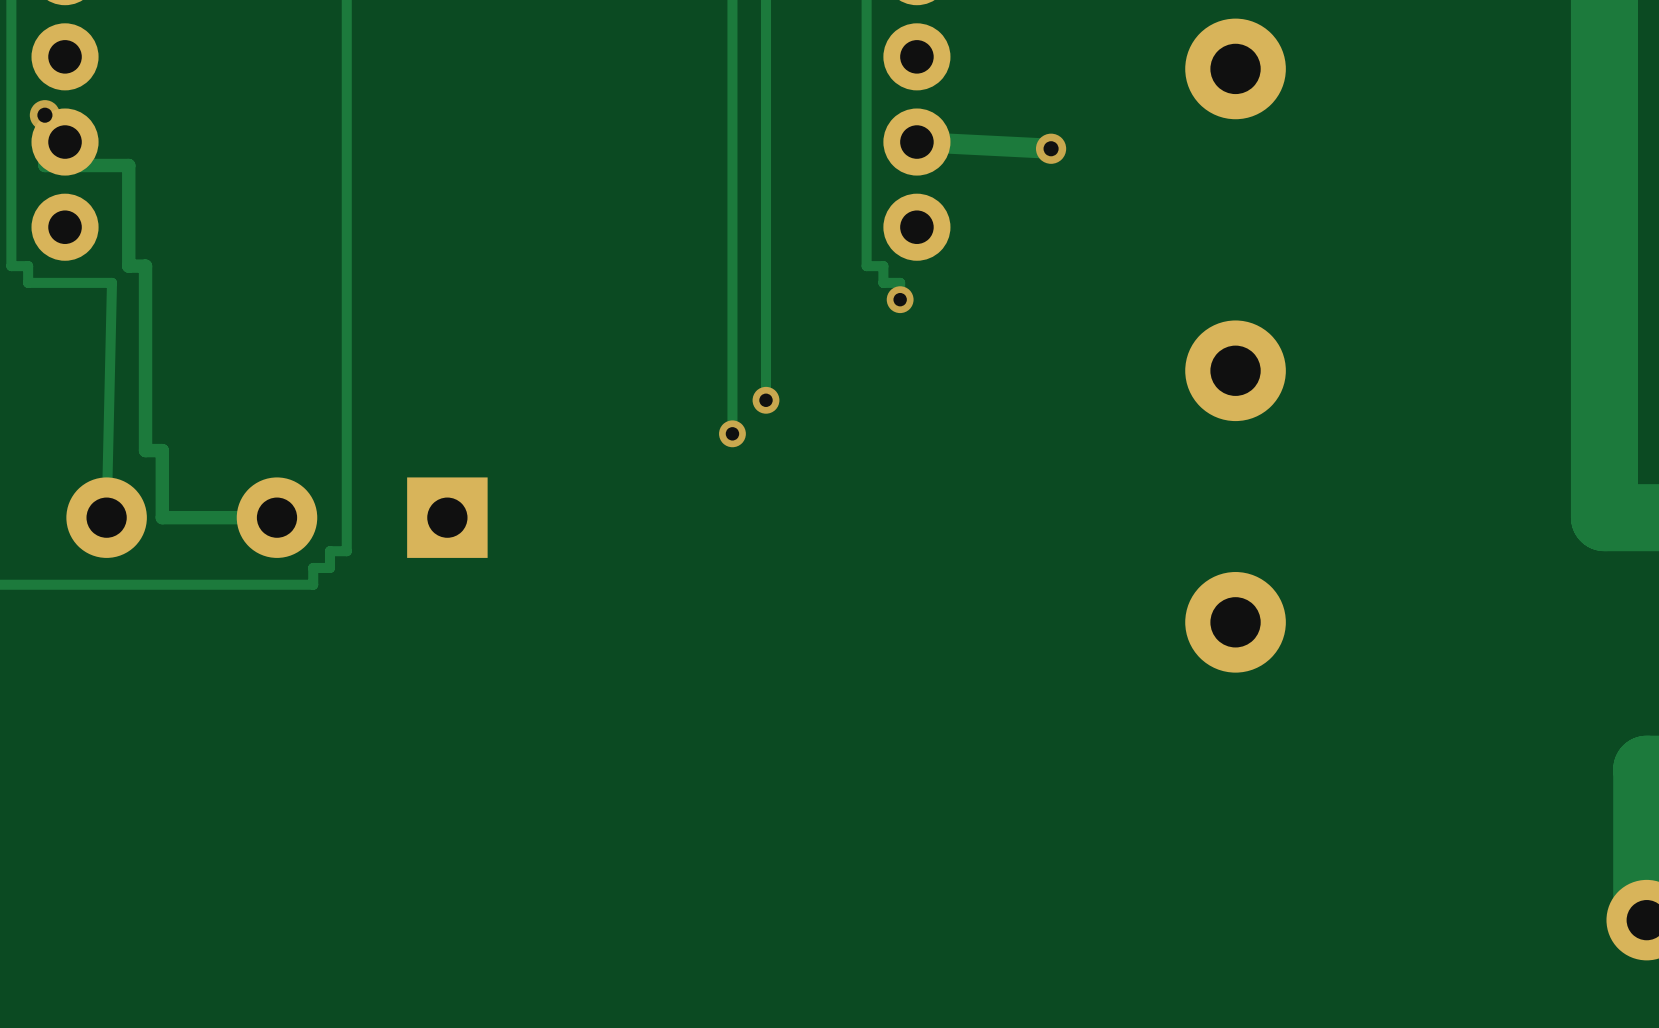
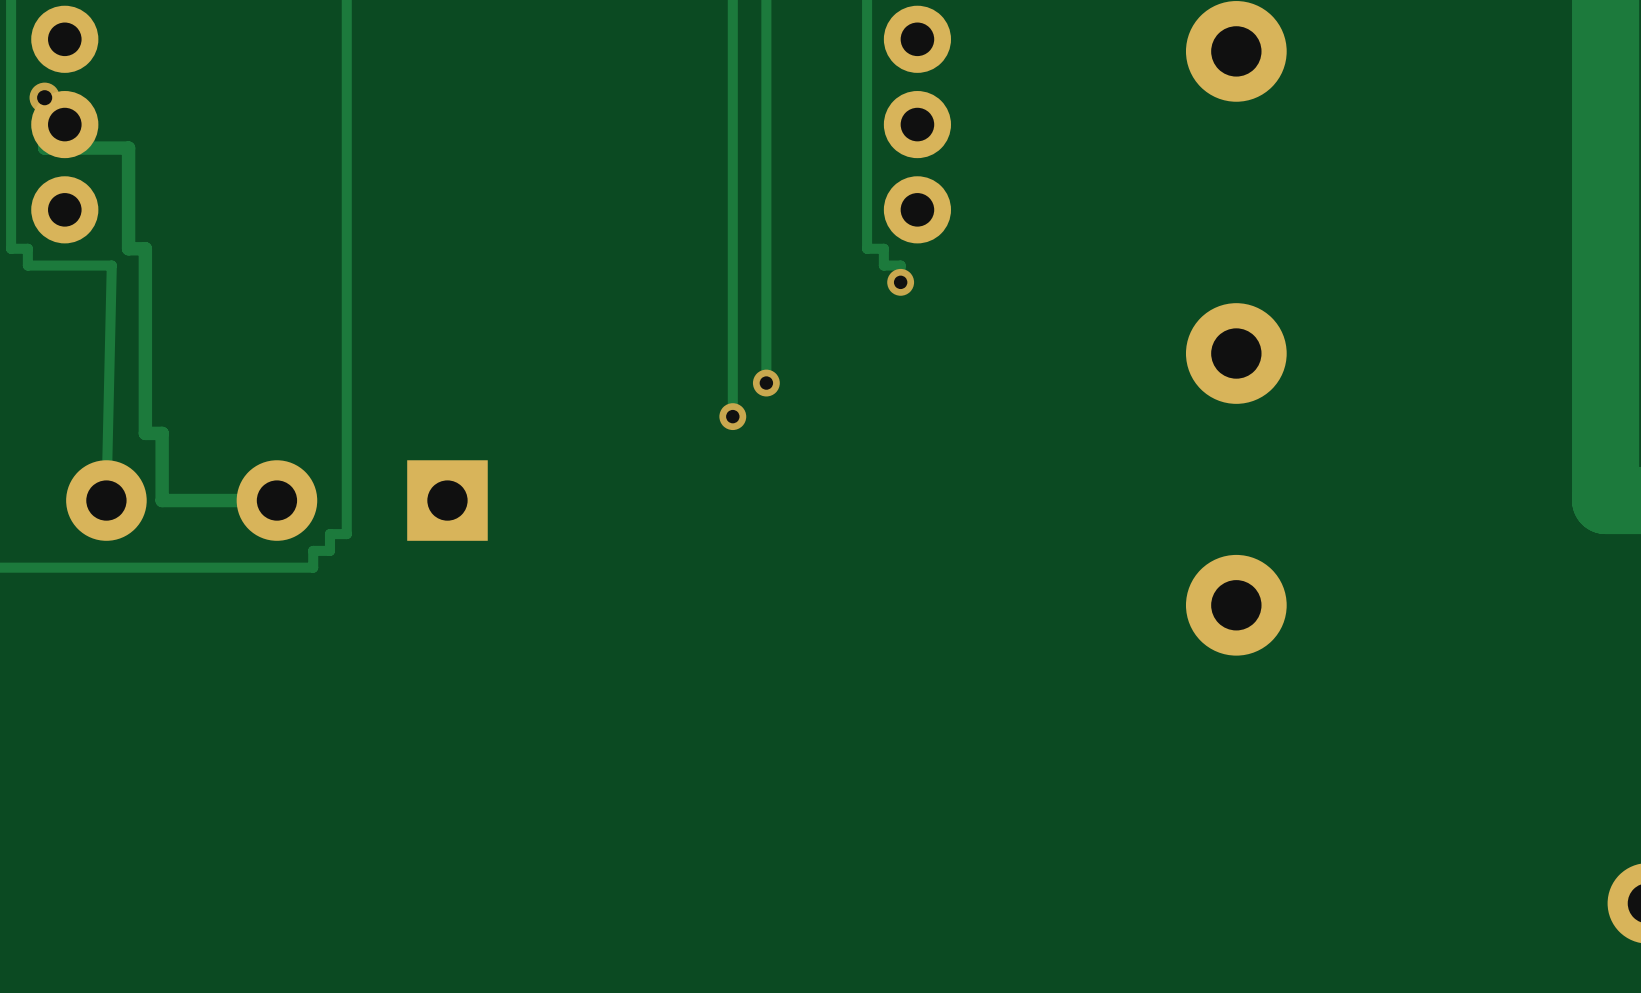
track: (916, 142) (1051, 148) -> none
via: (1051, 148) -> none

